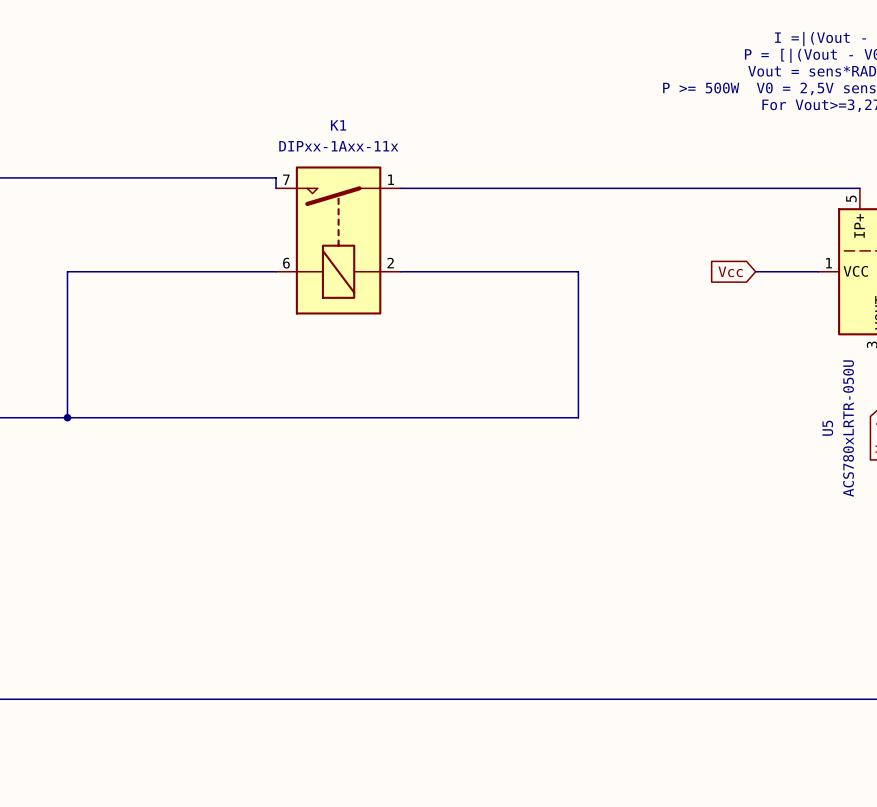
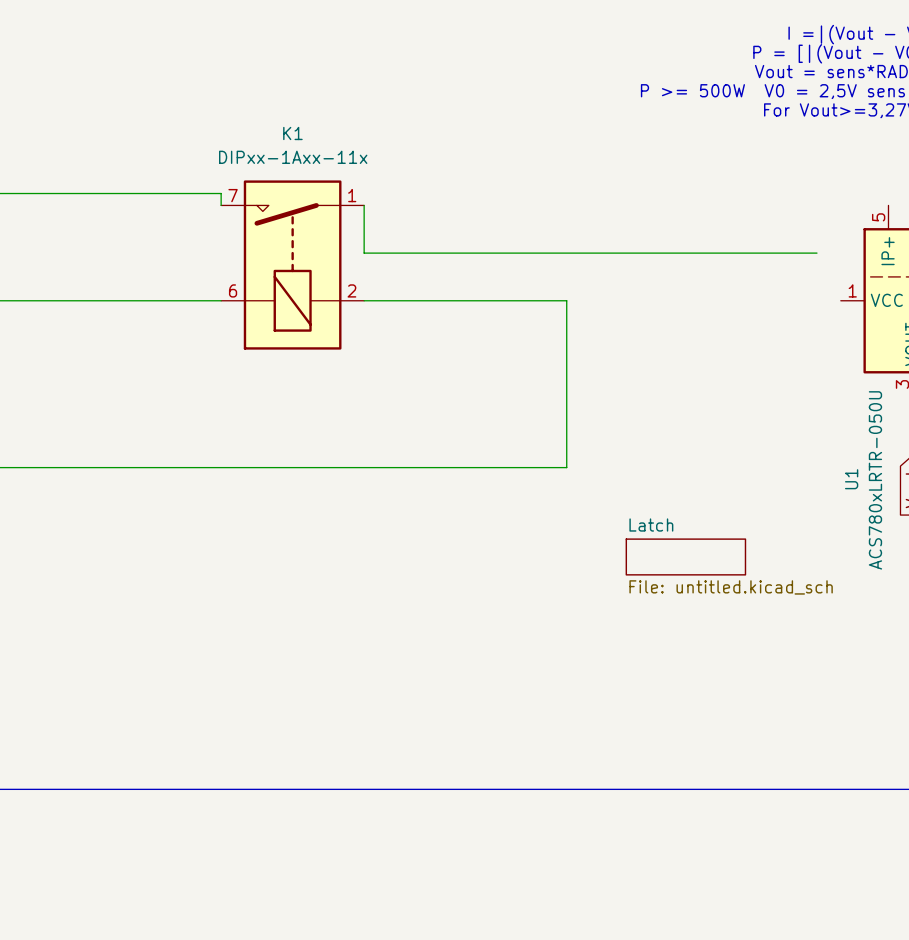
wire: (401, 188) (859, 188) -> (364, 205) (364, 253) (816, 253)
global label: Vcc (730, 271) -> none
wire: (755, 271) (818, 271) -> none
U5 name: U5 (827, 428) -> U1 (851, 479)
sheet Latch: none -> File: untitled.kicad_sch (685, 556)

